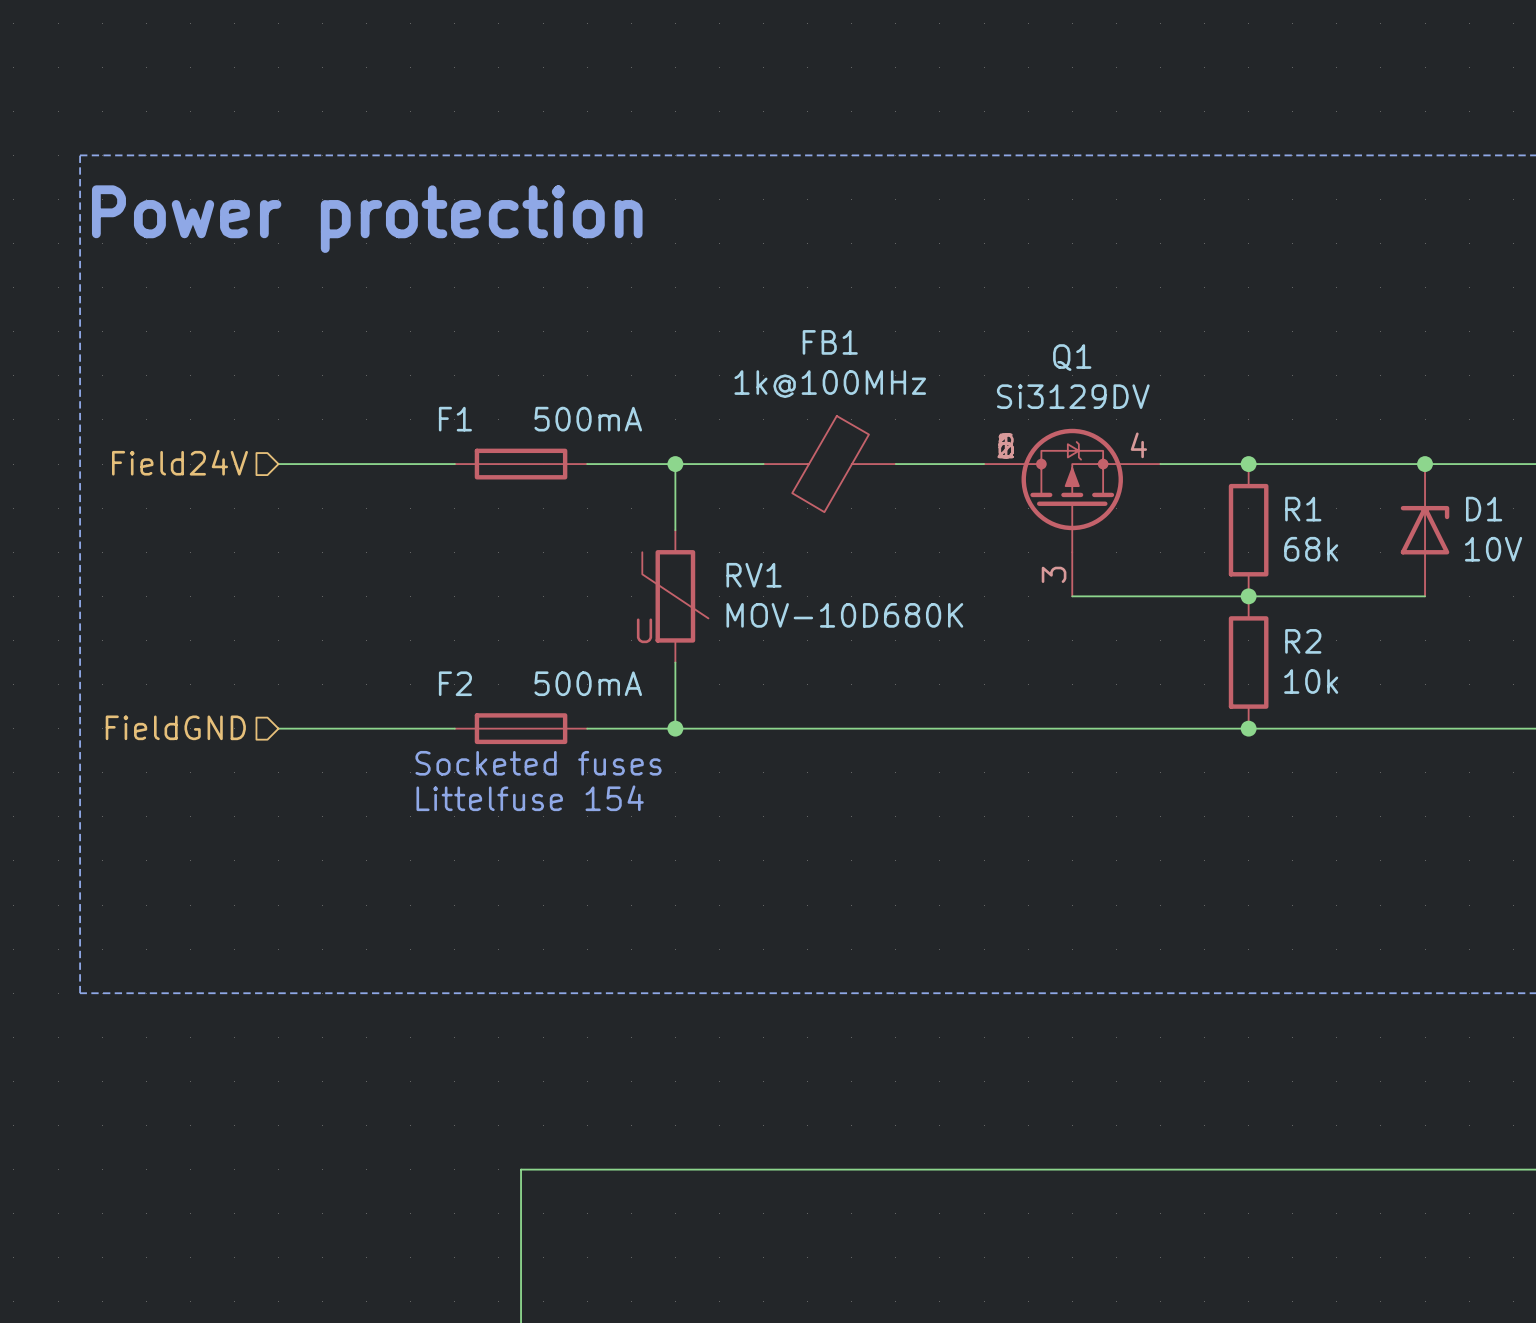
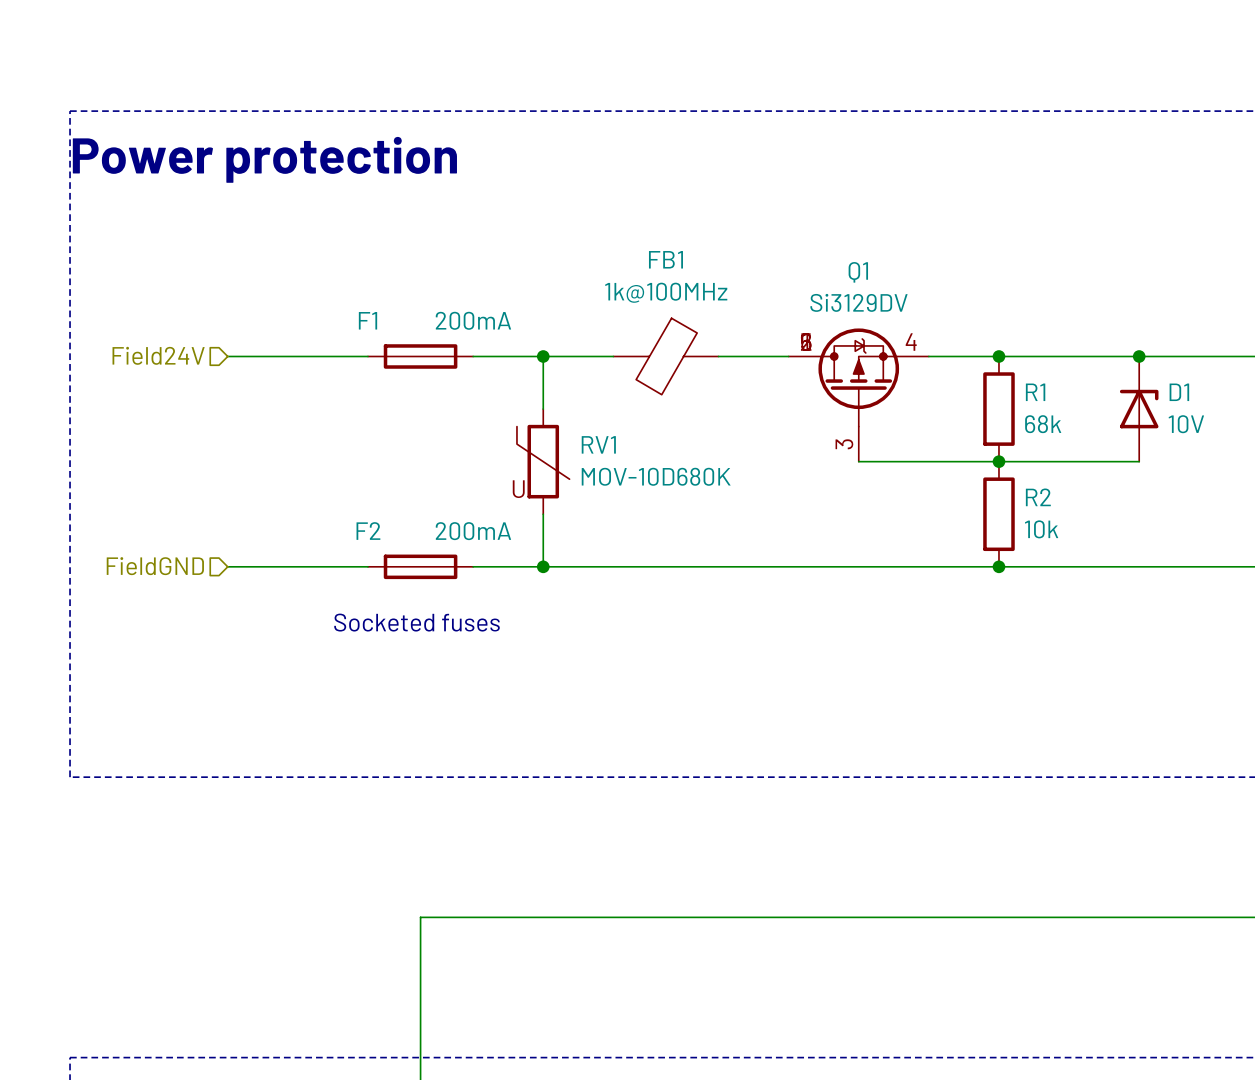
F1 value: 500mA (588, 419) -> 200mA (473, 320)
F2 value: 500mA (588, 683) -> 200mA (473, 531)
text: Socketed fuses (538, 763) -> none
text: Littelfuse 154 (530, 798) -> Socketed fuses (417, 622)

